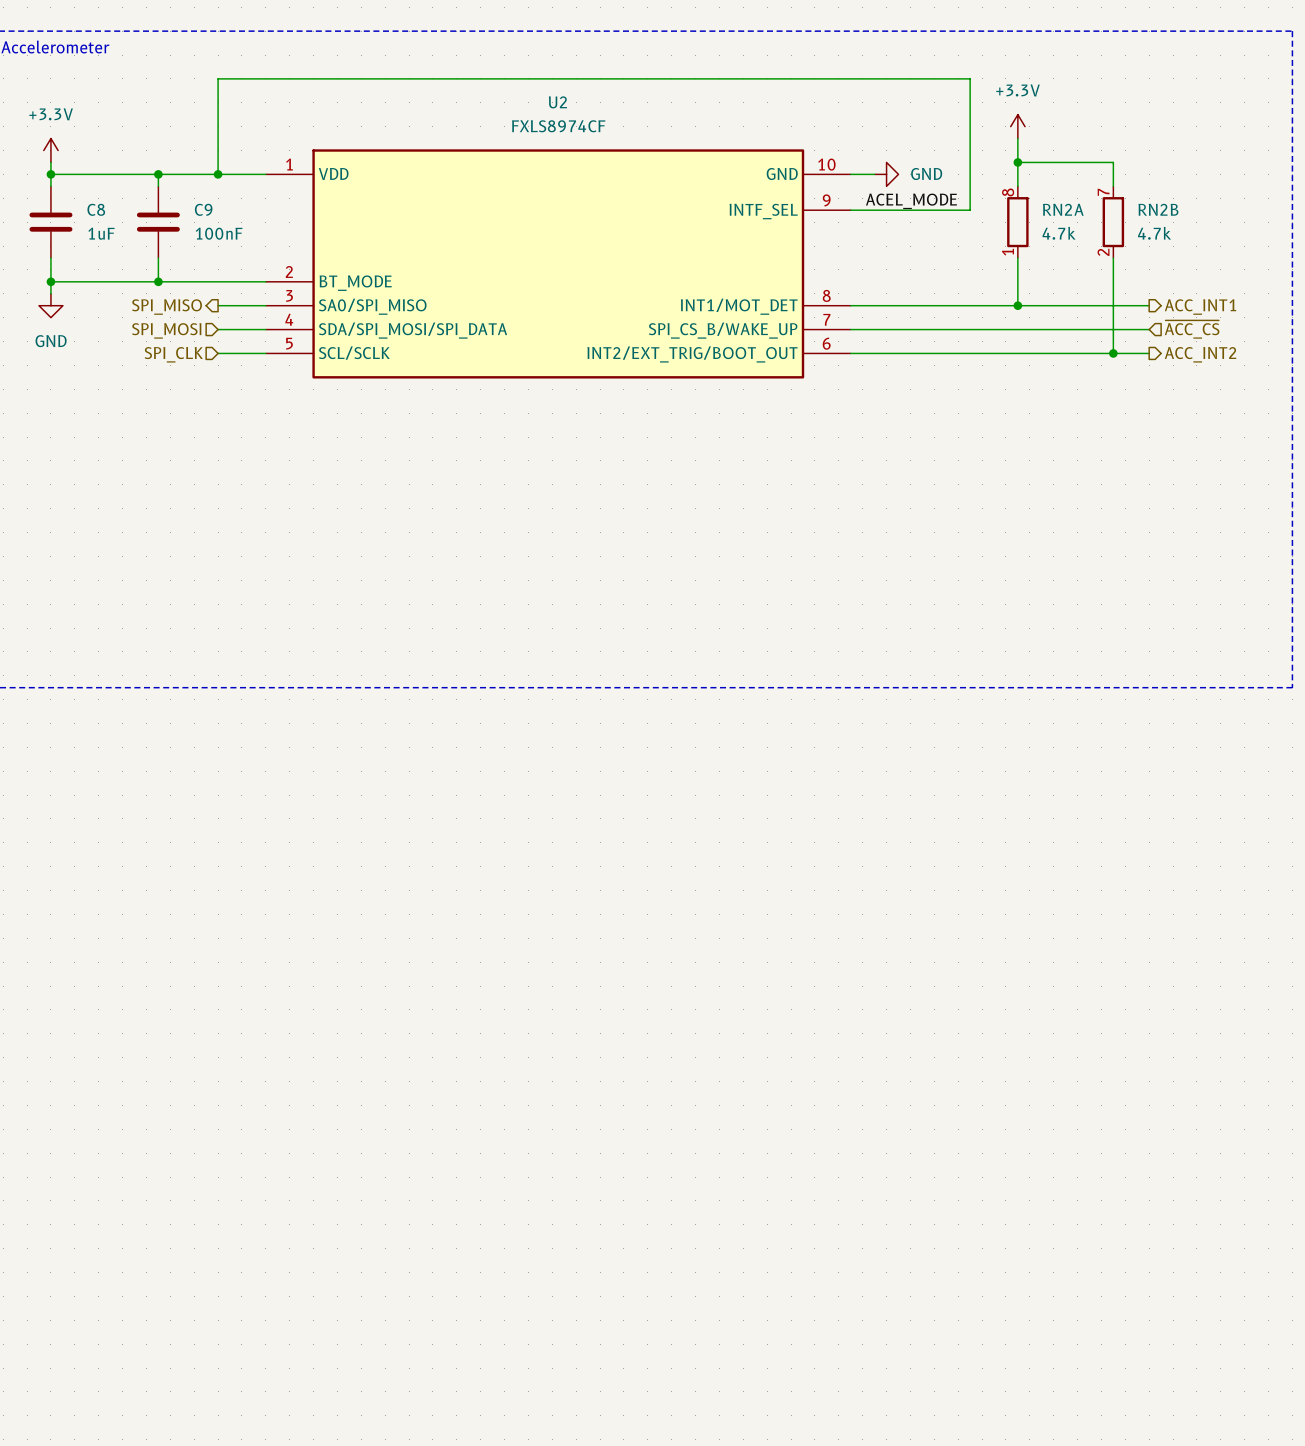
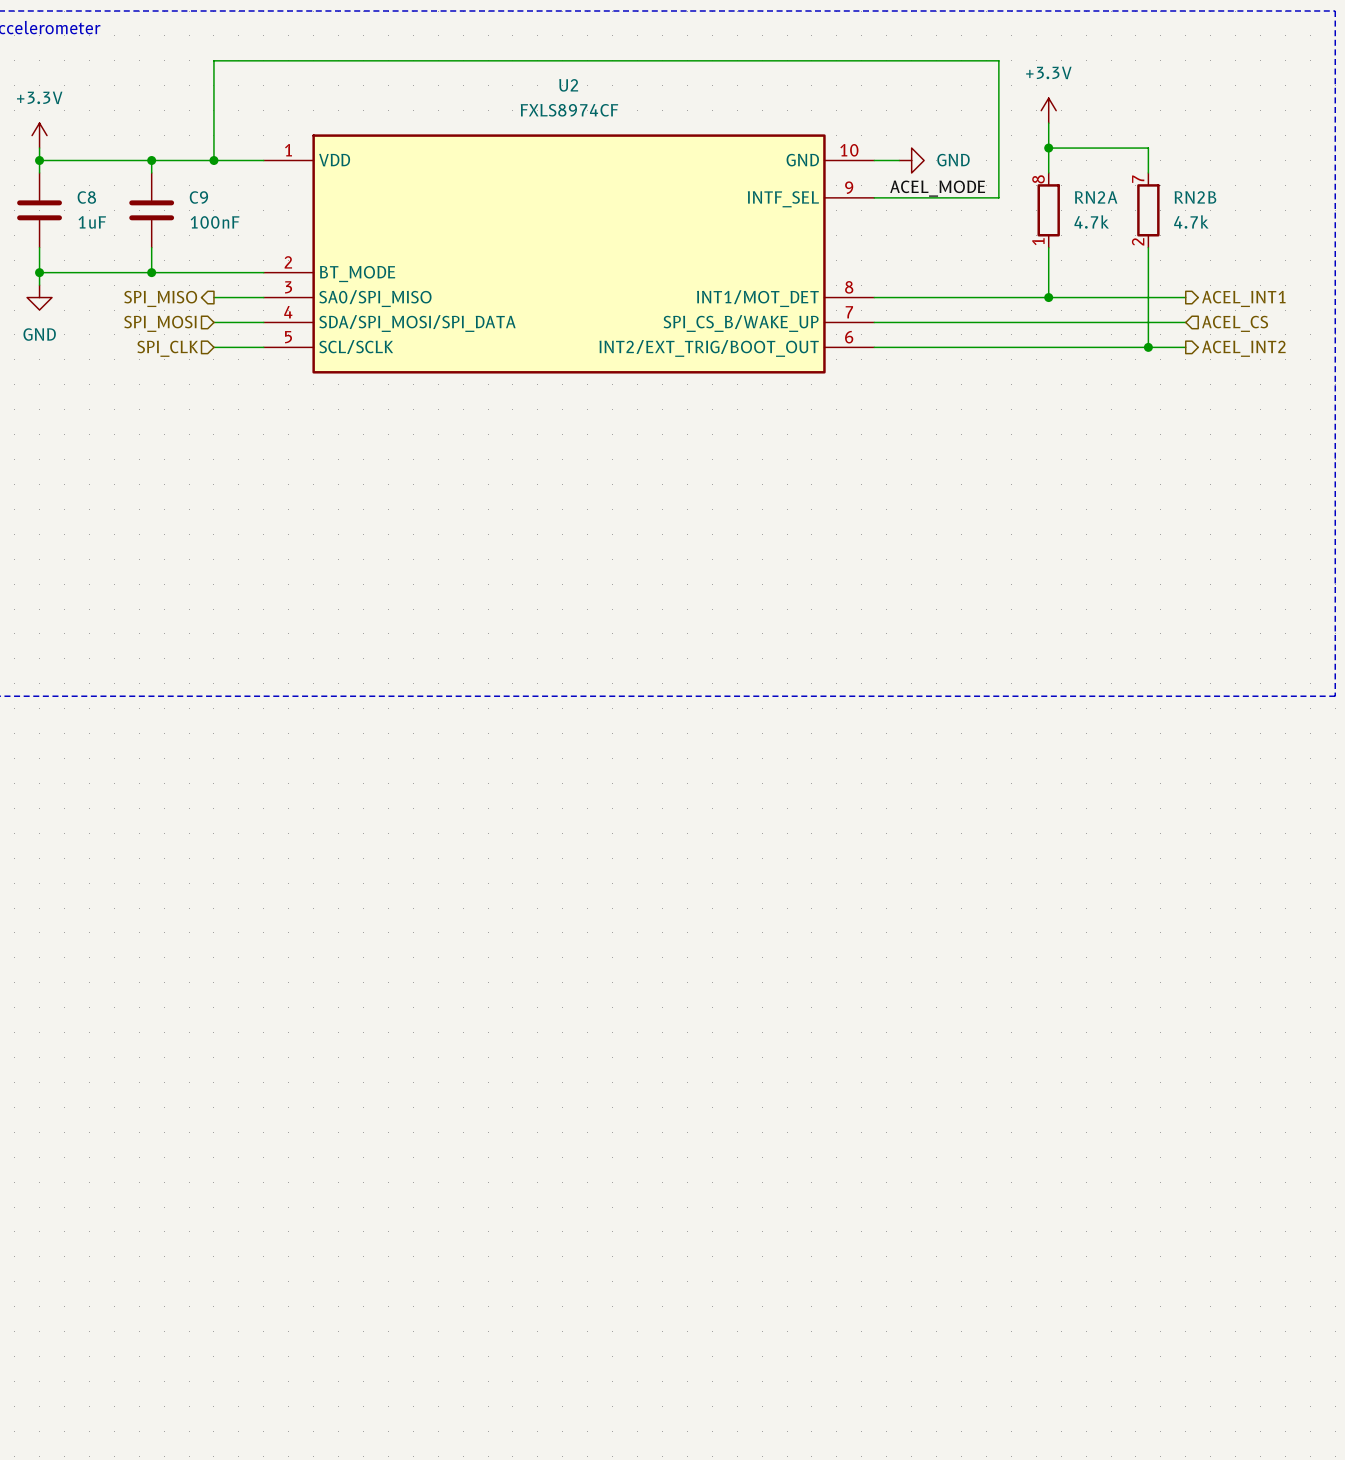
hierarchical label: ACC_INT1 (1200, 307) -> ACEL_INT1 (1243, 298)
hierarchical label: ~{ACC_CS} (1192, 329) -> ACEL_CS (1235, 323)
hierarchical label: ACC_INT2 (1200, 354) -> ACEL_INT2 (1243, 348)

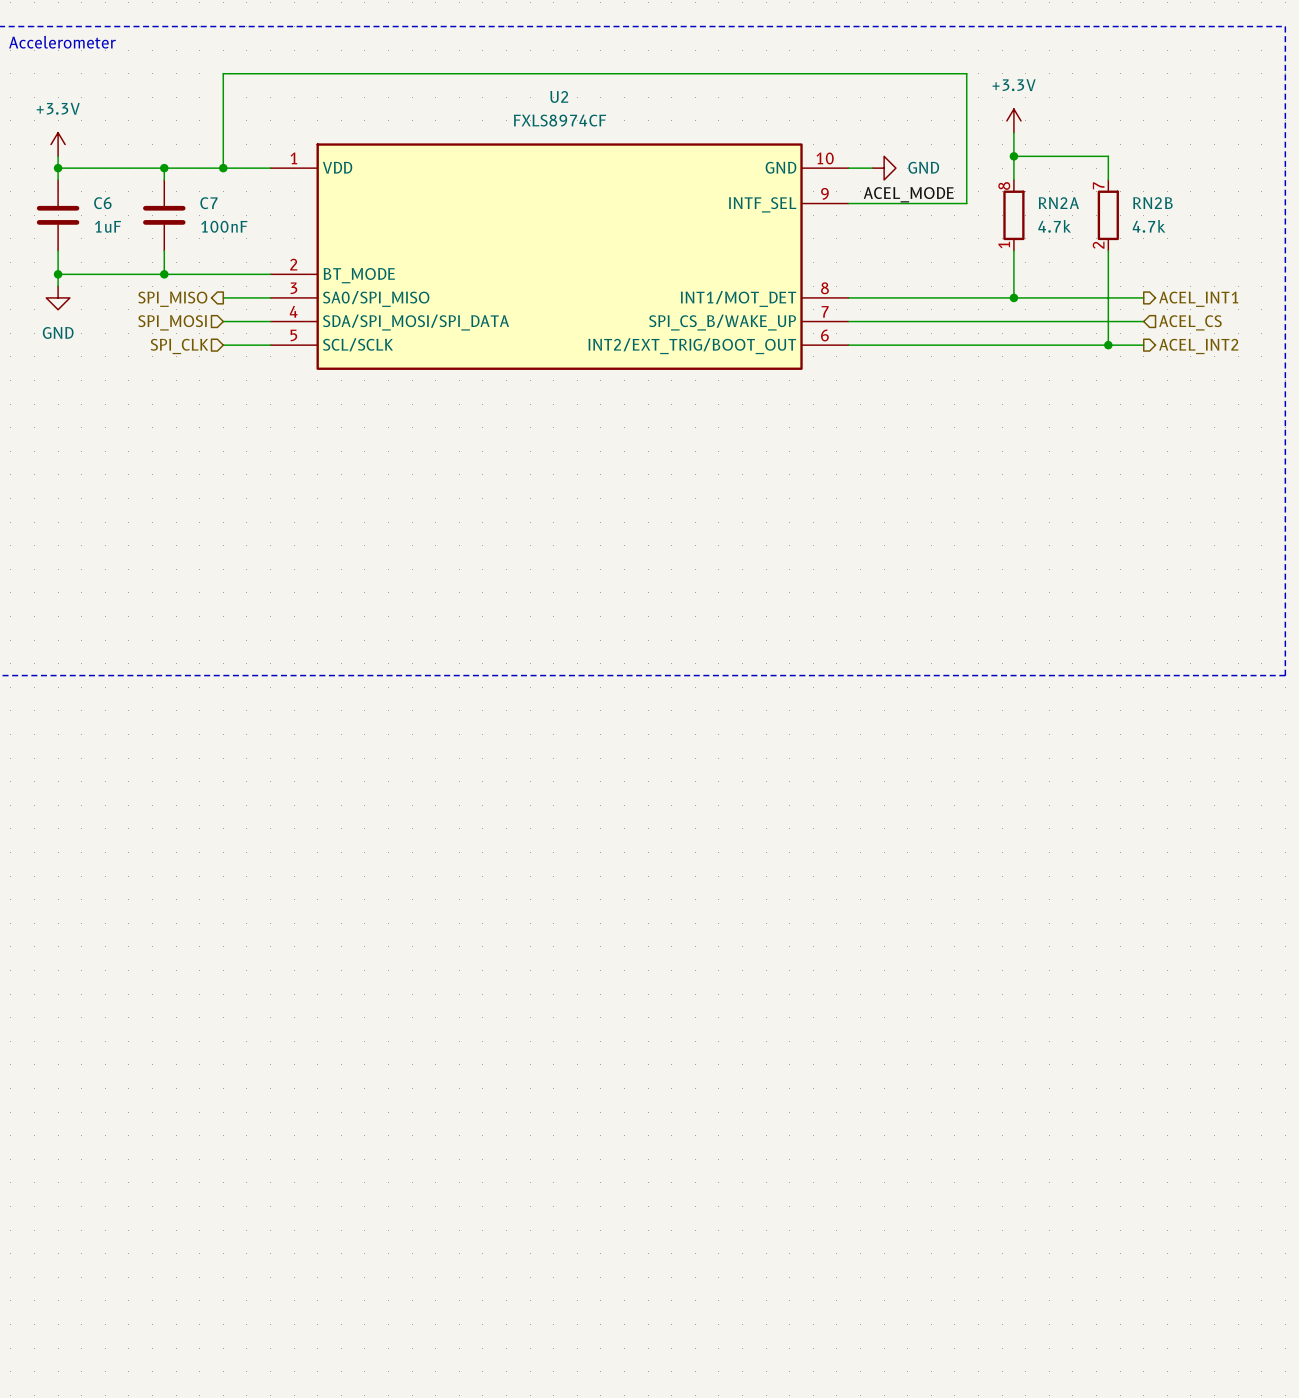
C8 name: C8 (86, 197) -> C6 (102, 203)
C9 name: C9 (198, 197) -> C7 (208, 203)

